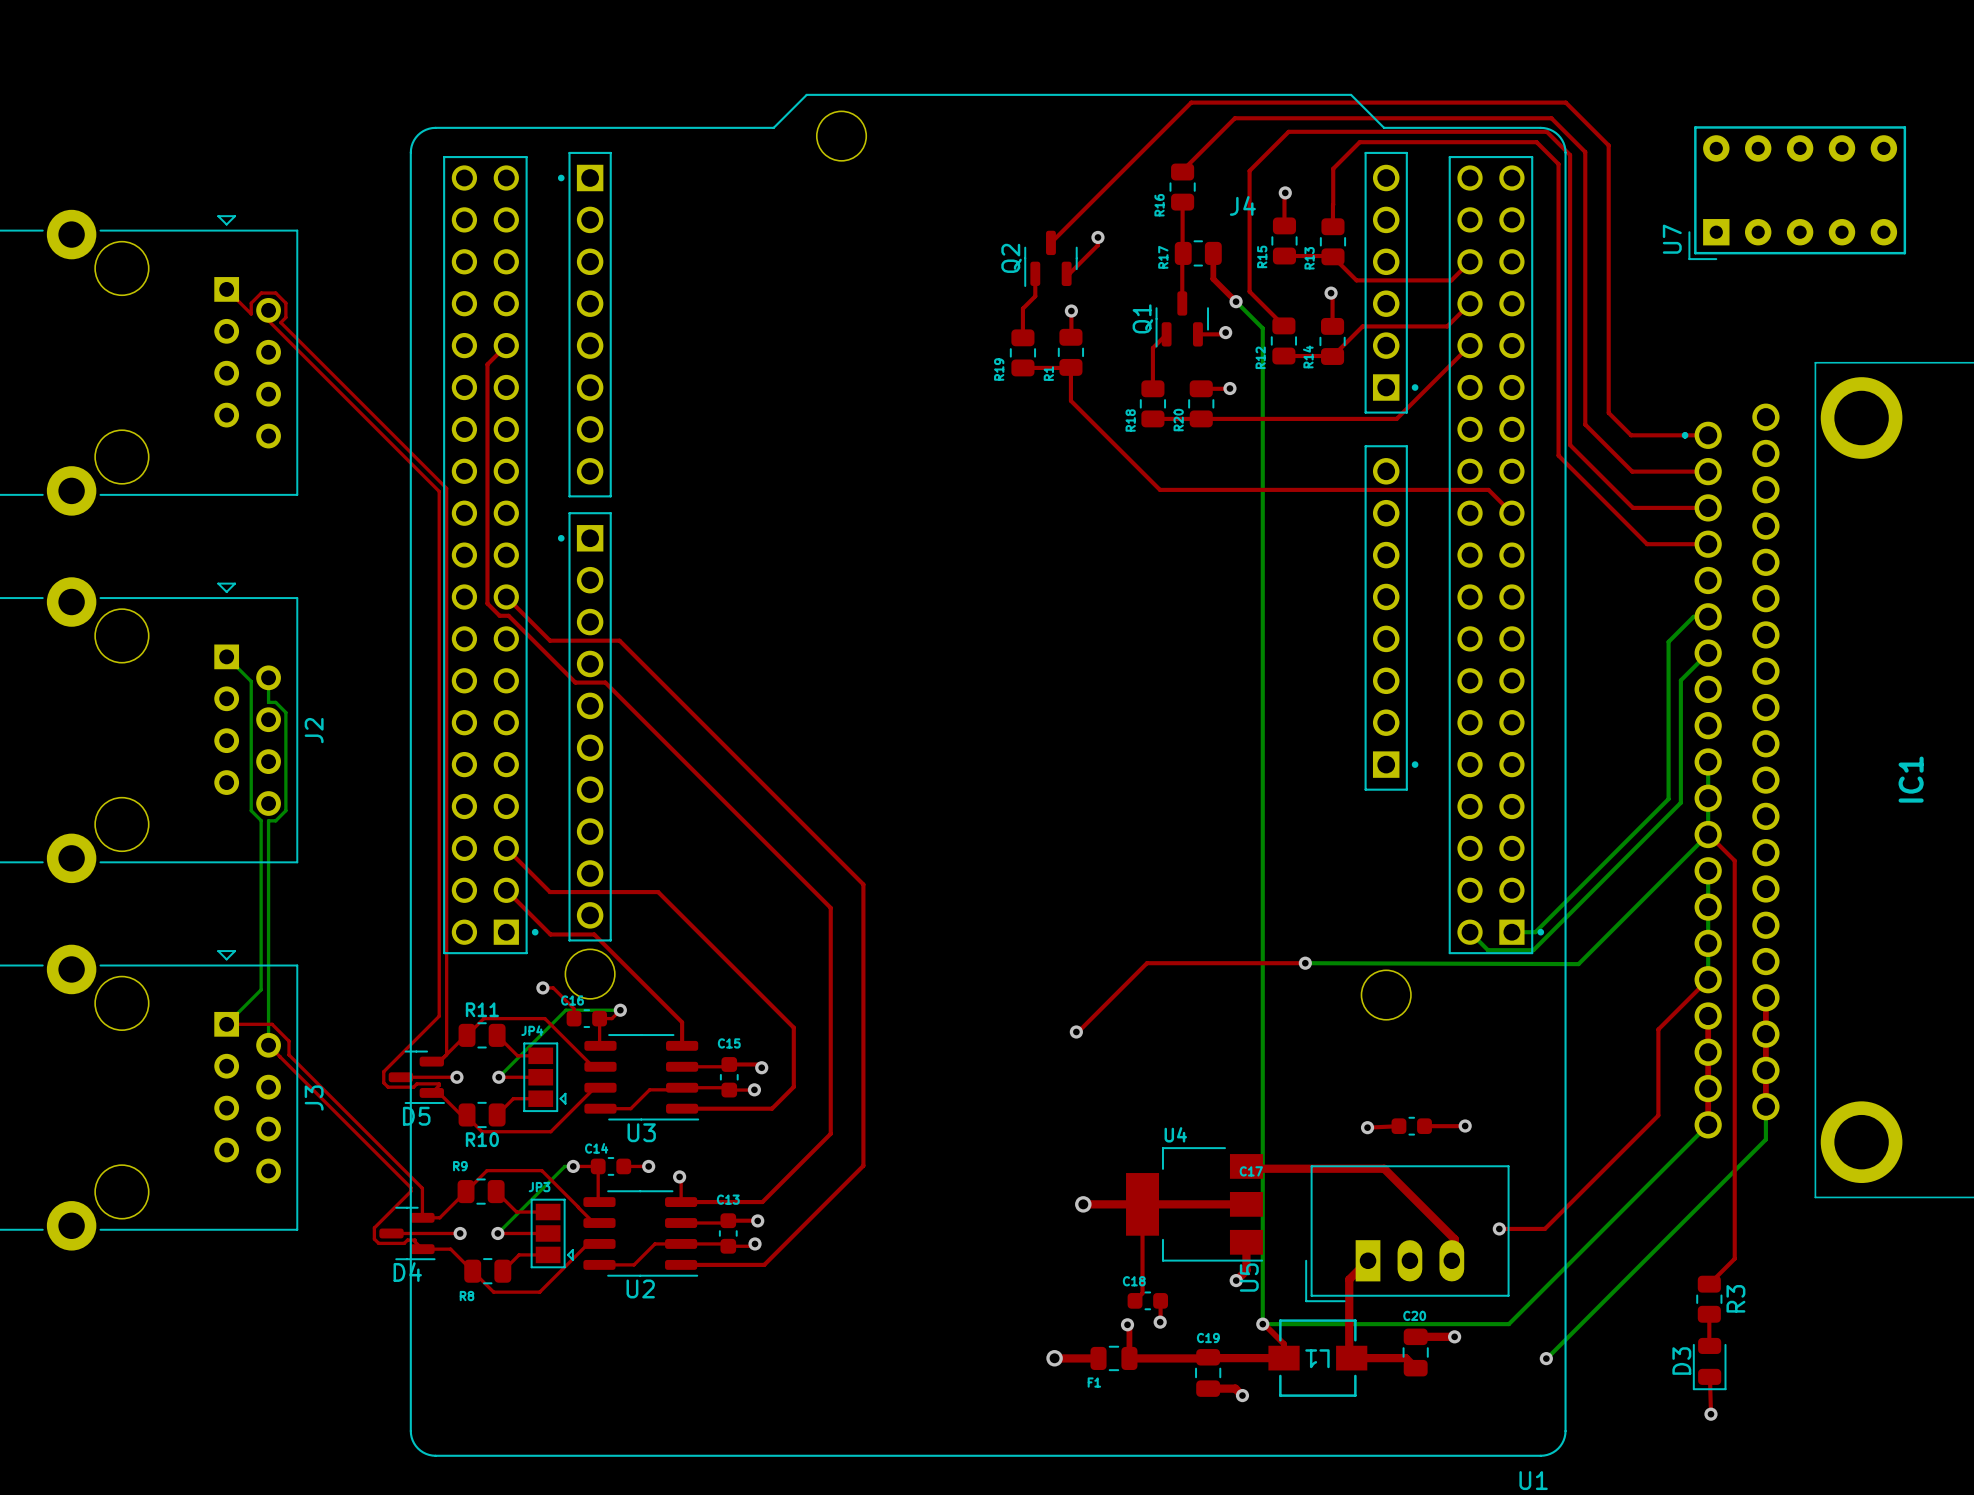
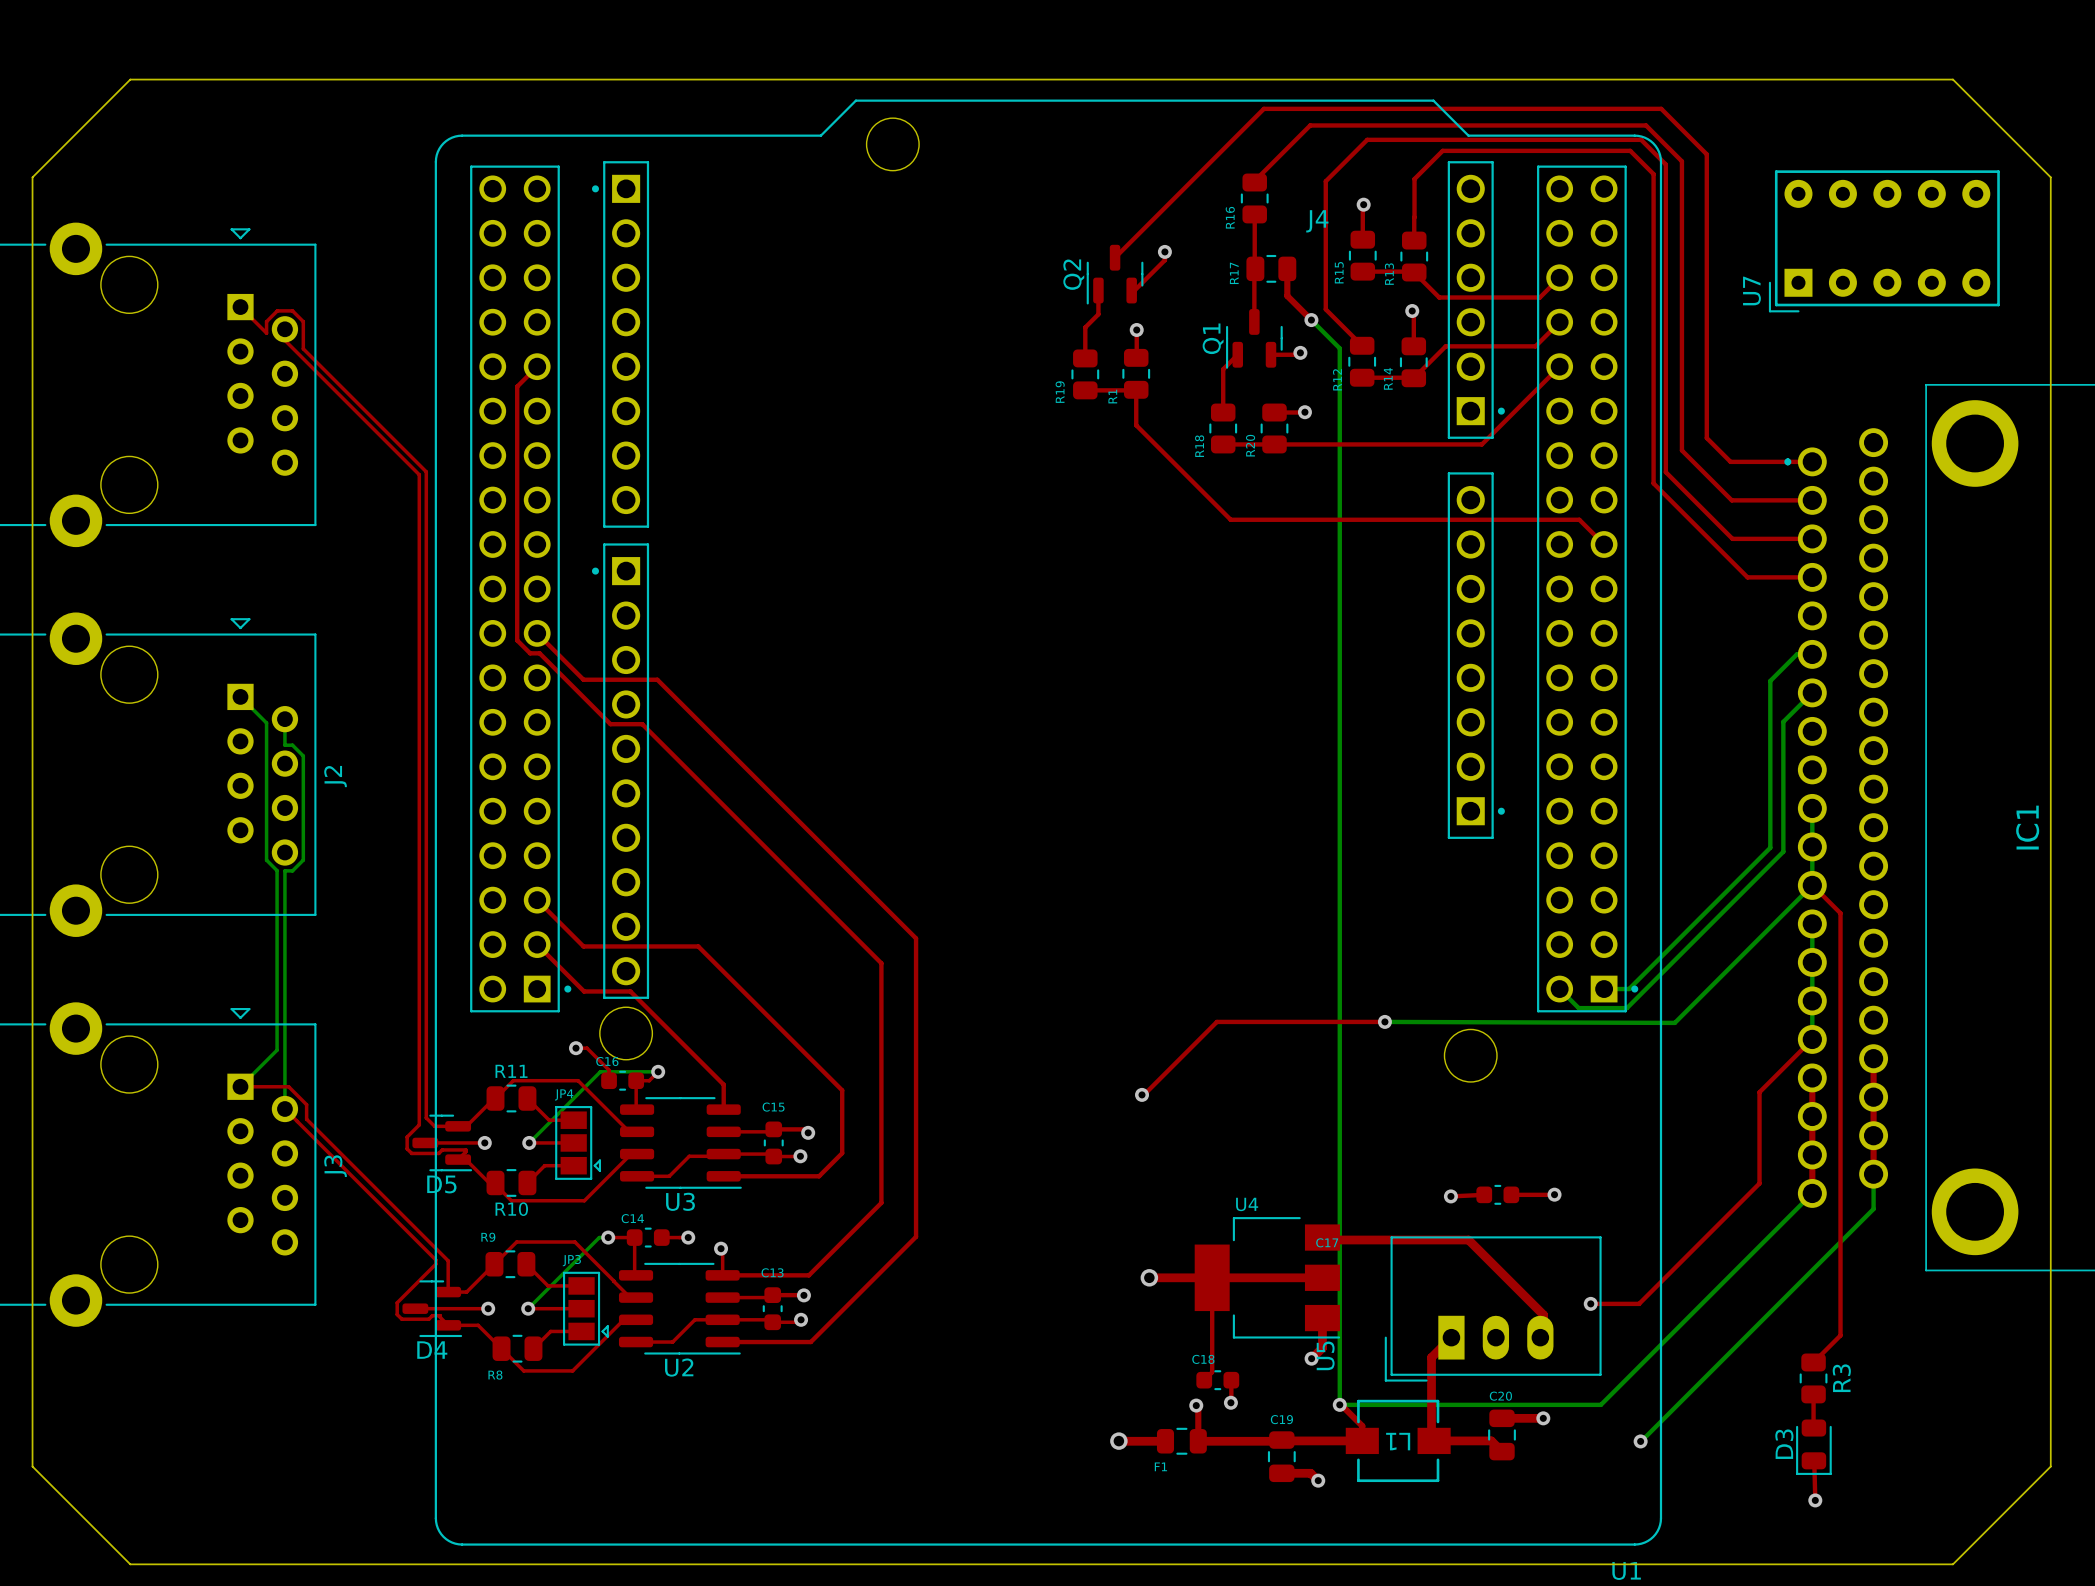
board edge: none -> (130, 79) (32, 177) (32, 1466) (130, 1564) (1952, 1564) (2050, 1466) (2050, 177) (1952, 79) (130, 79)
U7 position: (1797, 193) -> (1884, 241)
top track: (285, 317) (280, 322) (446, 488) (446, 1054) (442, 1059) (431, 1059) (431, 1061) -> (303, 336) (303, 348) (426, 471) (426, 1117) (434, 1126) (458, 1126)
top track: (395, 447) (439, 491) (439, 1016) (395, 1060) -> (419, 474) (419, 1124)

